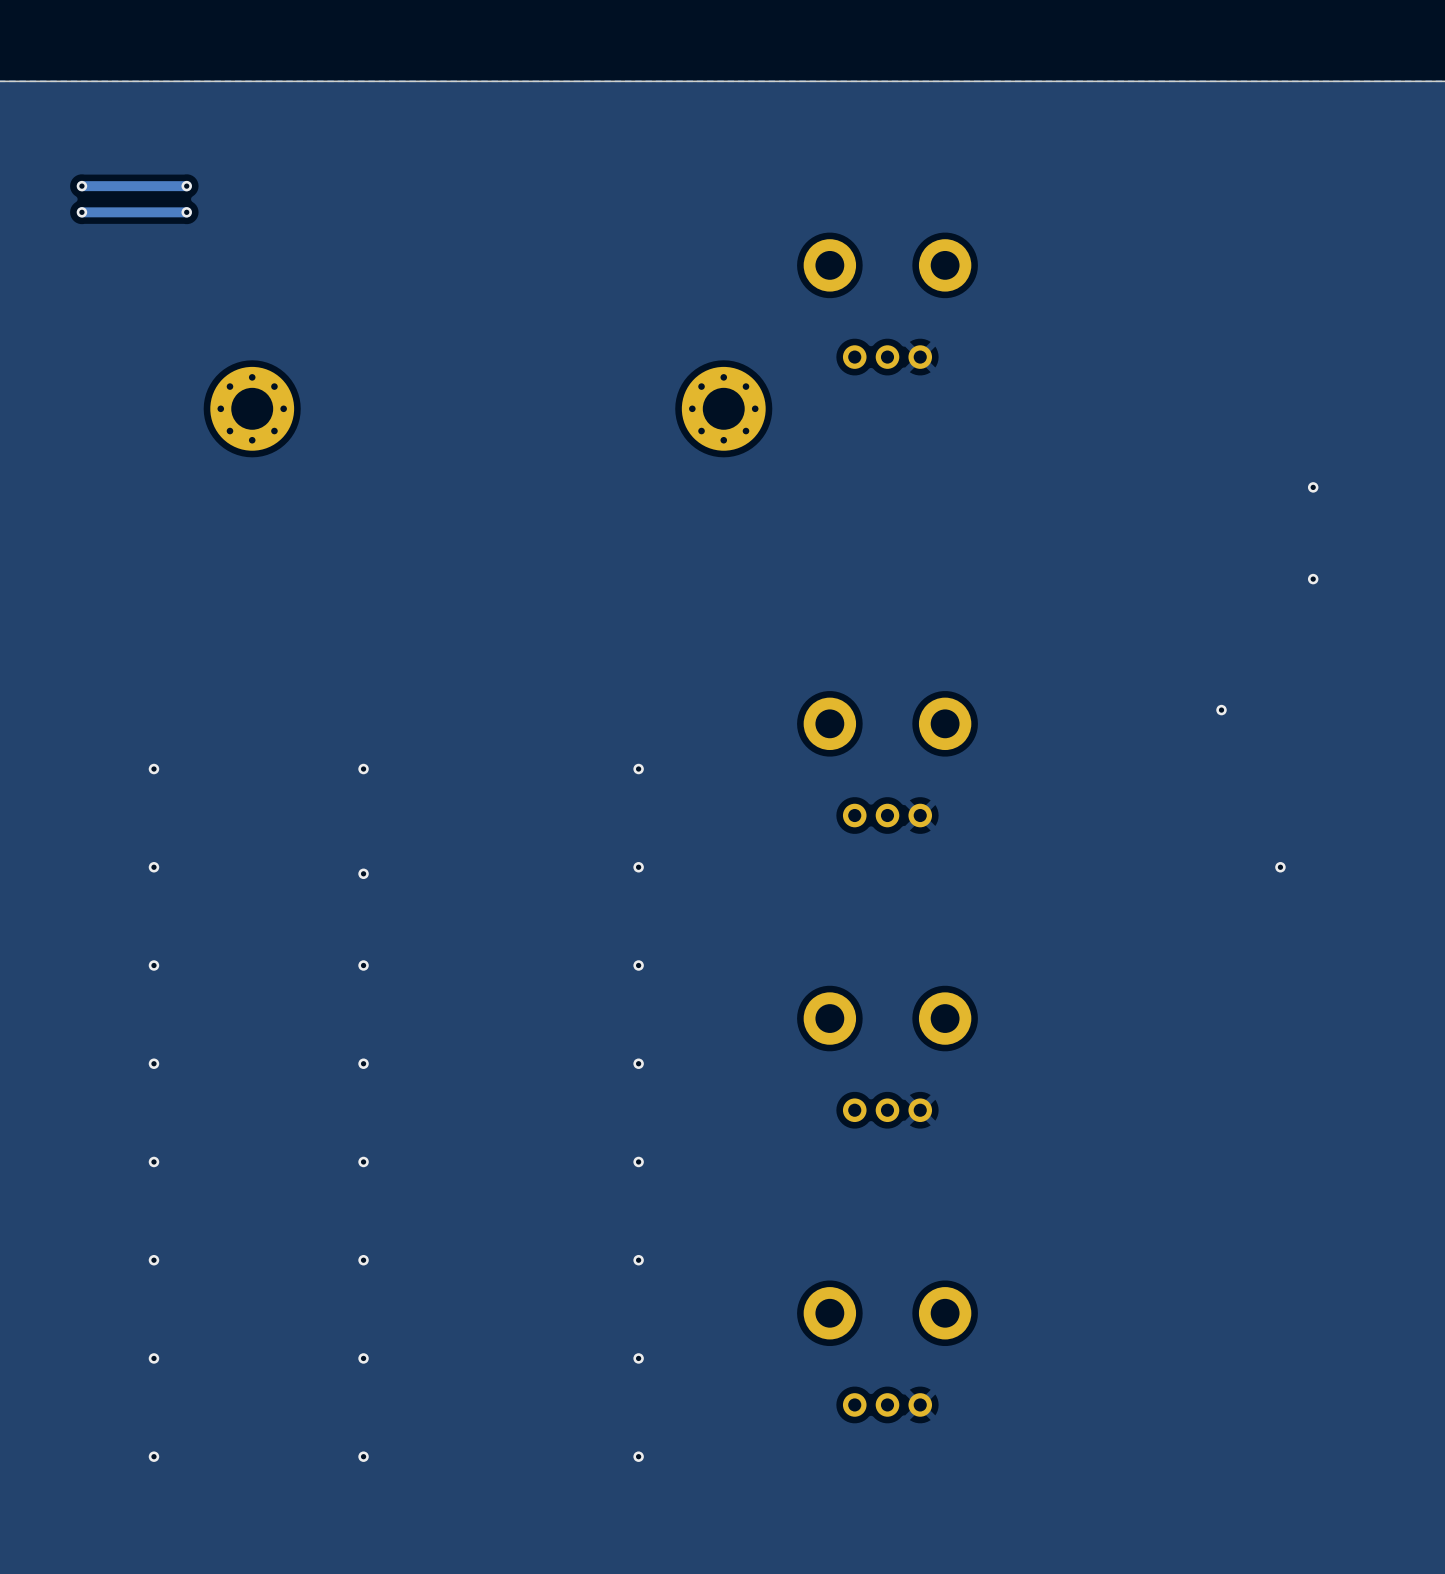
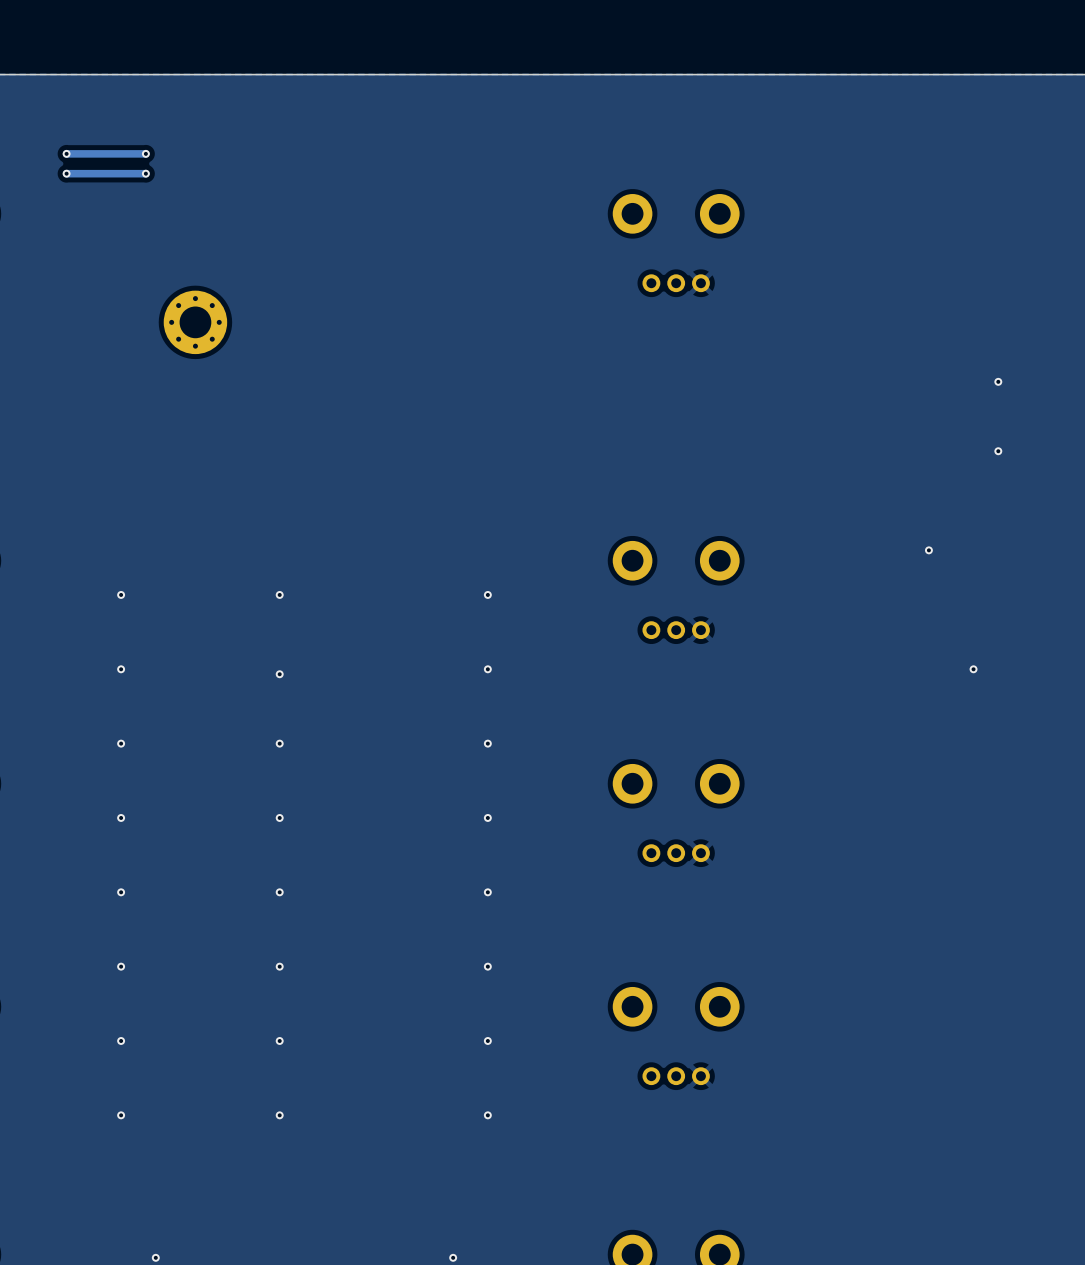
part: (723, 408) -> none

